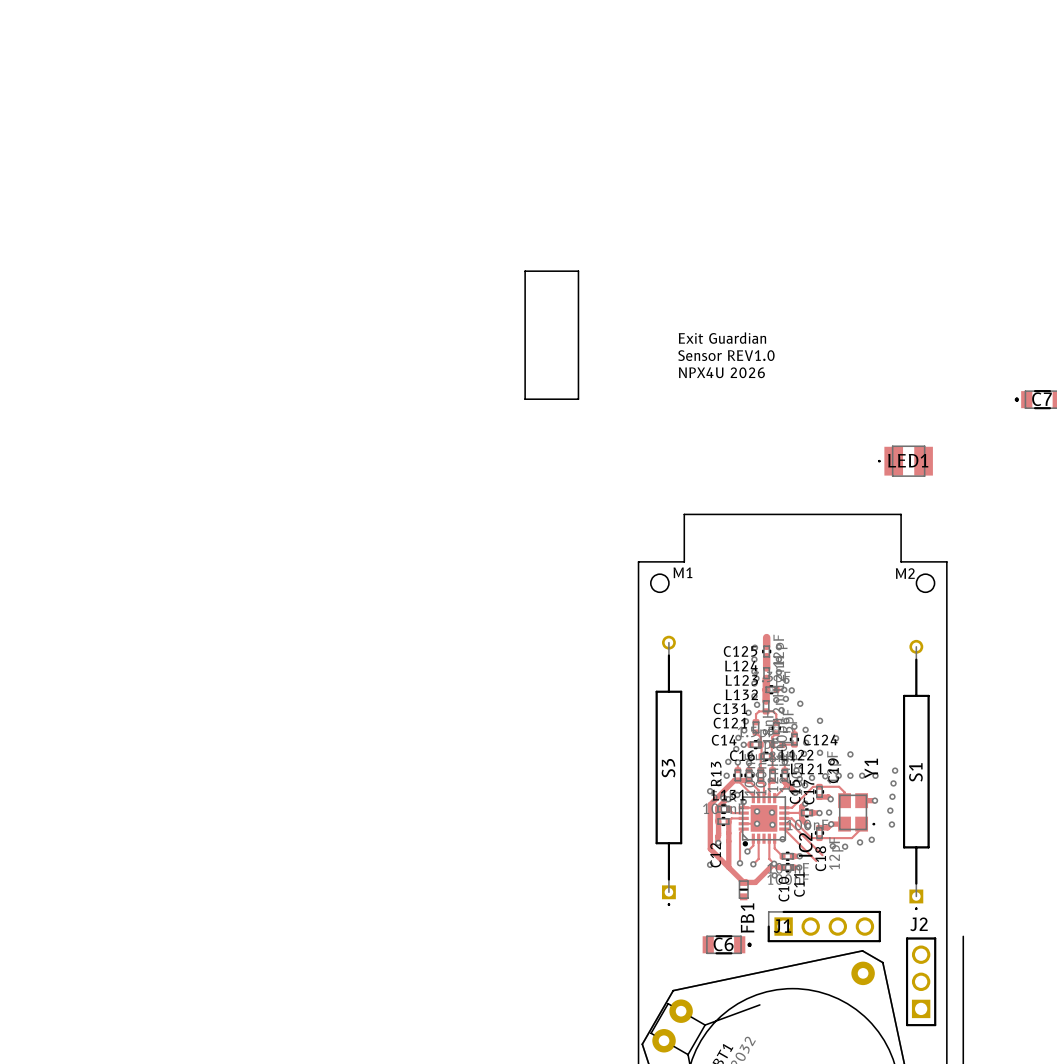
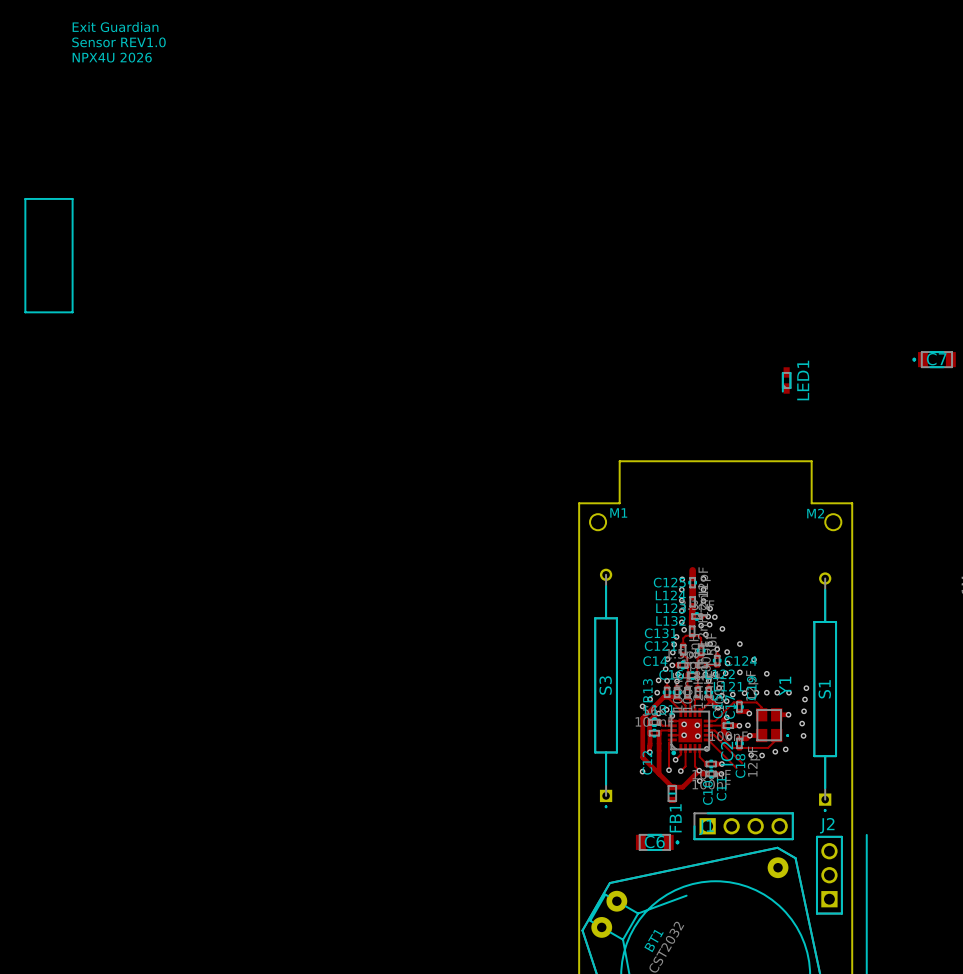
text: none -> Exit Guardian (115, 27)
text: none -> Sensor REV1.0 (118, 42)
text: none -> NPX4U 2026 (112, 57)
line: none -> (25, 198) (72, 198) (72, 312) (25, 312) (25, 198)
line: (525, 271) (578, 271) (578, 399) (525, 399) (525, 271) -> none
text: Exit Guardian (722, 338) -> none
text: Sensor REV1.0 (726, 355) -> none
text: NPX4U 2026 (721, 372) -> none
LED1 footprint: [878, 445, 933, 477] -> [781, 367, 792, 394]

